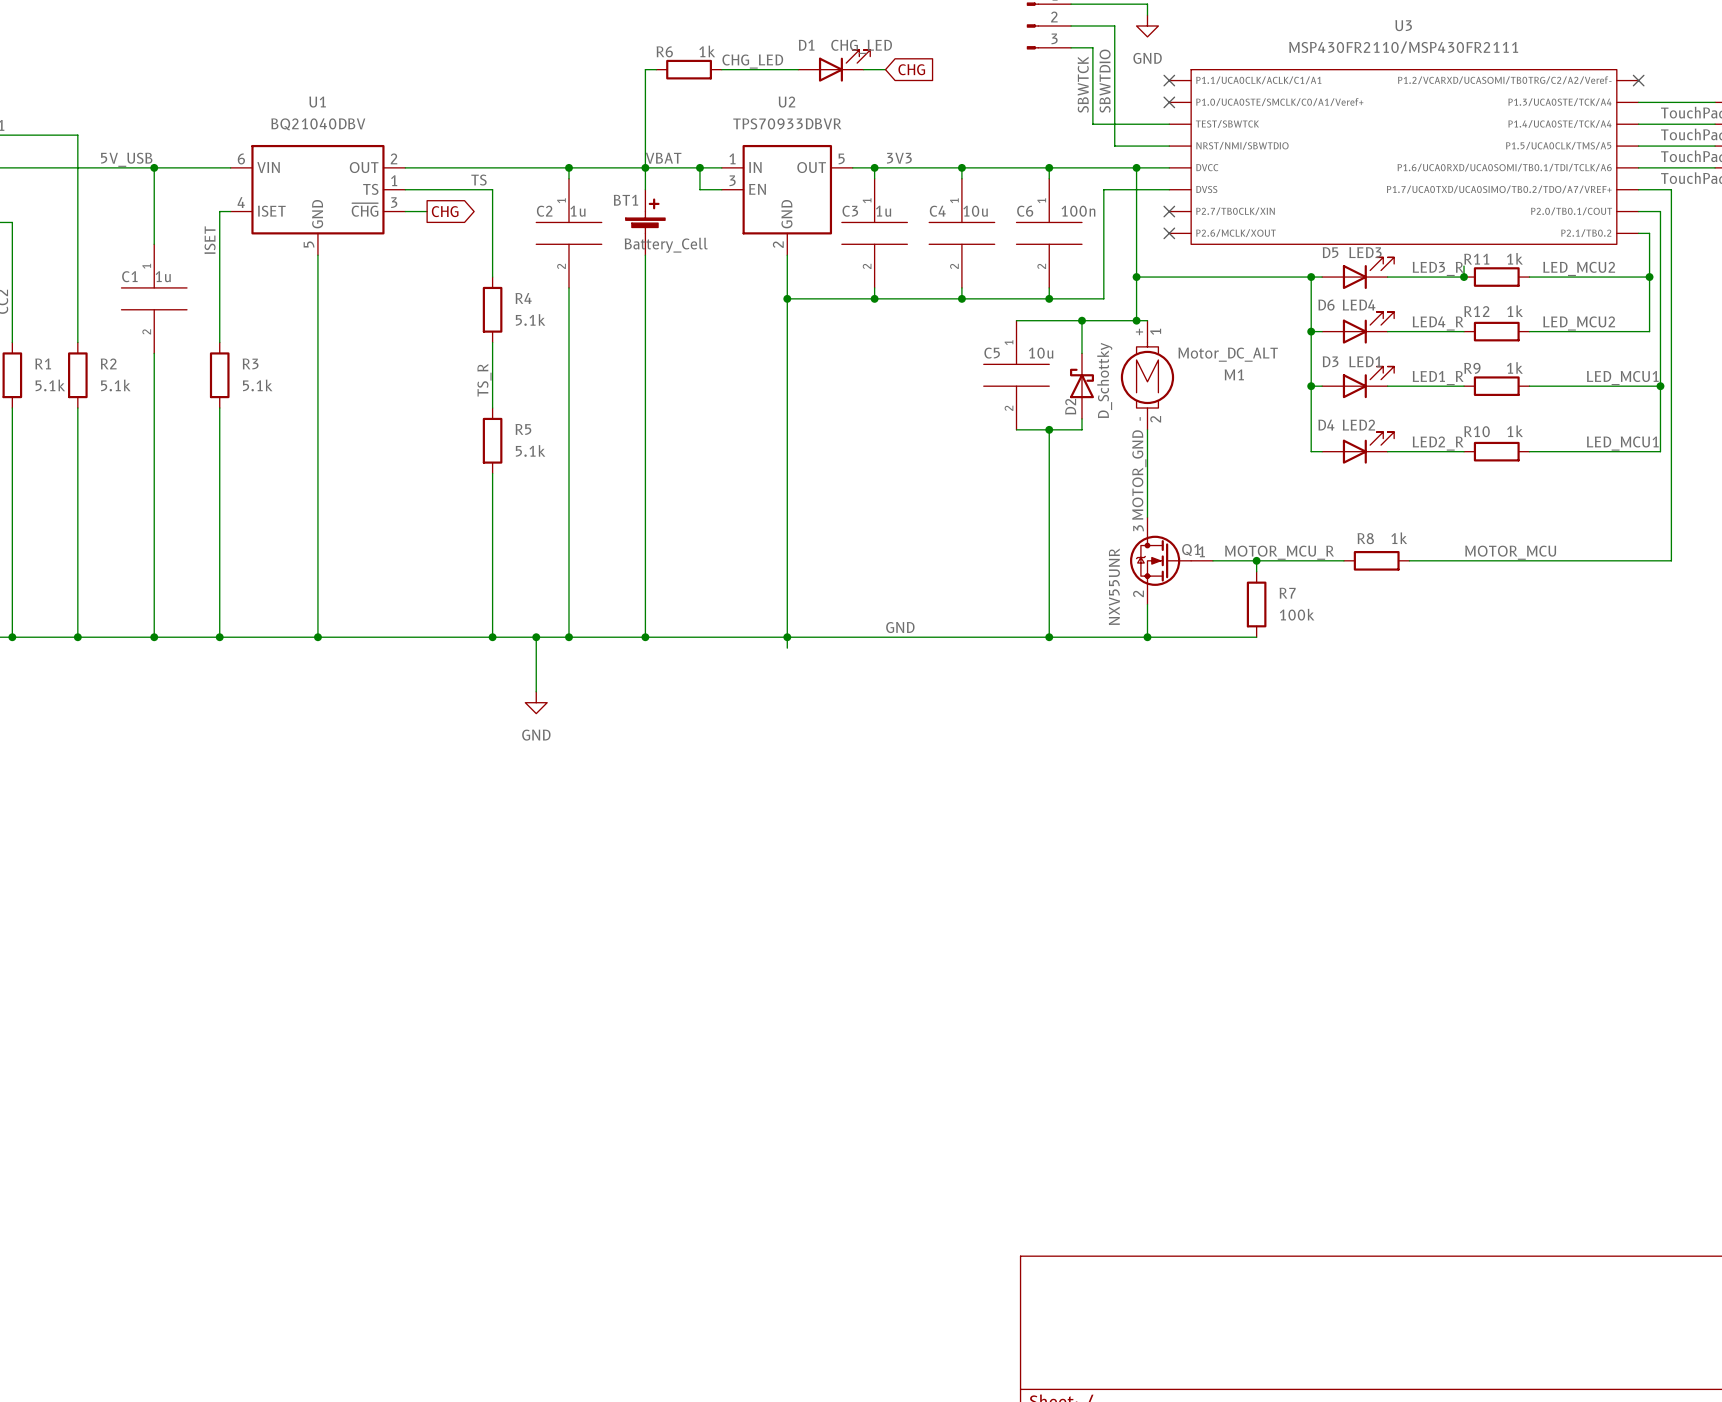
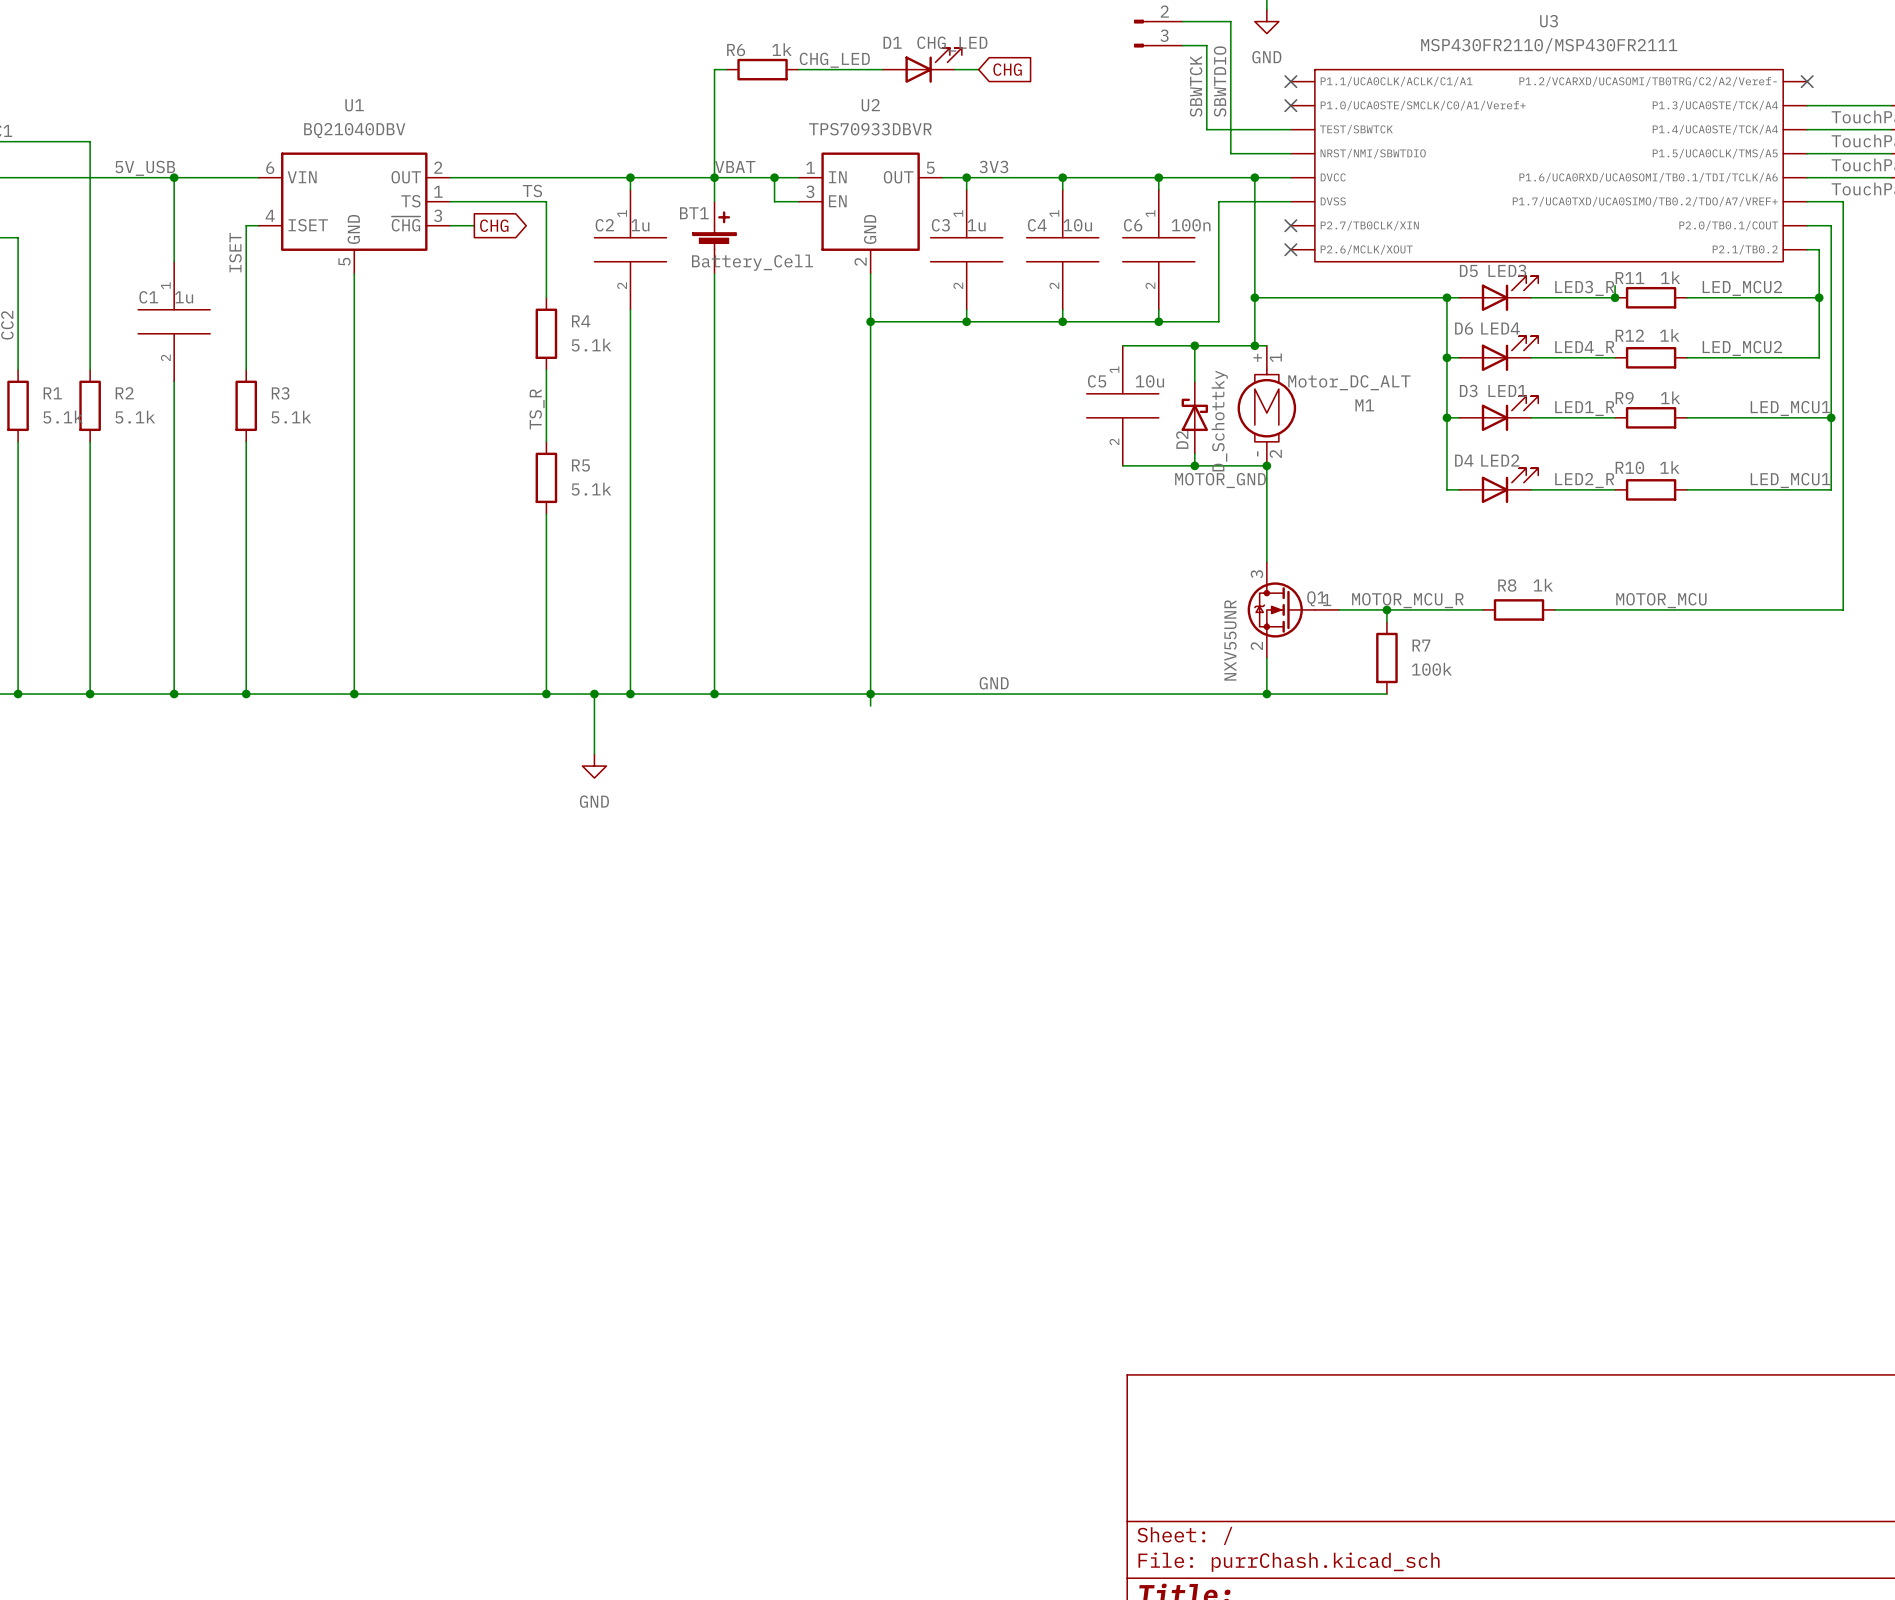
wire: (1049, 429) (1049, 637) -> none
junction position: (1049, 429) -> (1194, 465)
wire: none -> (1194, 465) (1266, 465)
junction: none -> (1266, 465)
label rotation: 0° (1139, 475) -> 90° clockwise (1220, 480)
junction: (1049, 637) -> none

